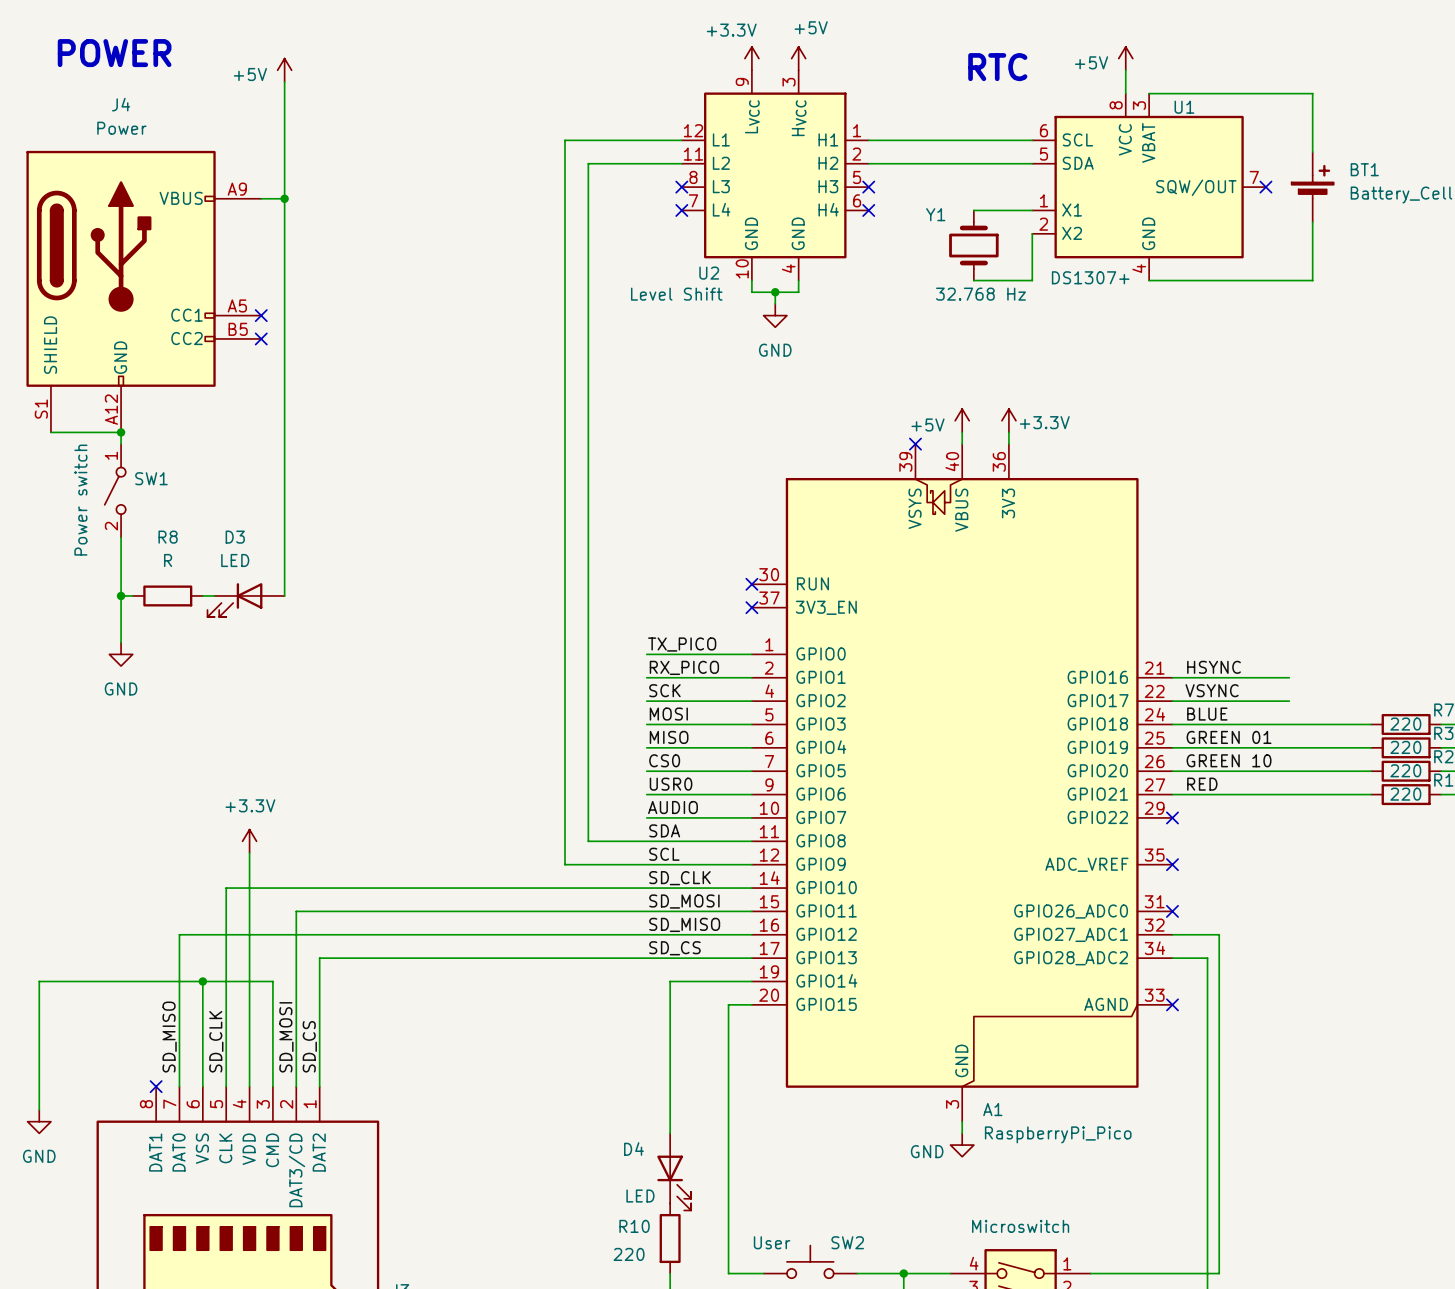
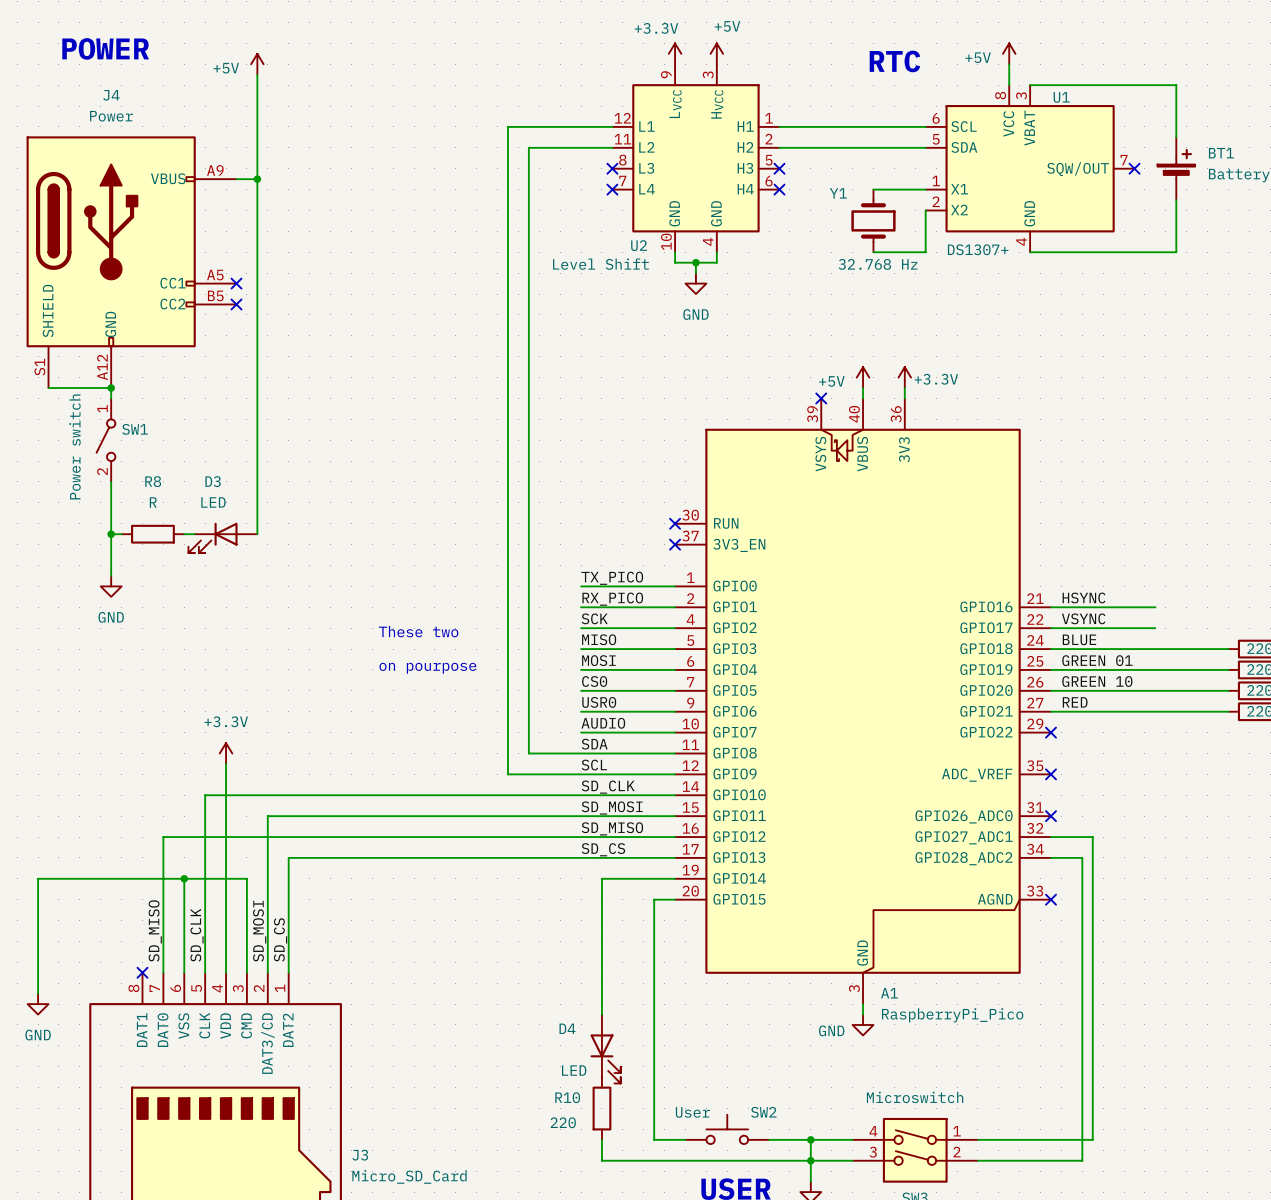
text: none -> These two (418, 631)
label: MOSI (668, 714) -> MISO (599, 639)
label: MISO (669, 737) -> MOSI (598, 660)
text: none -> on pourpose (427, 668)

